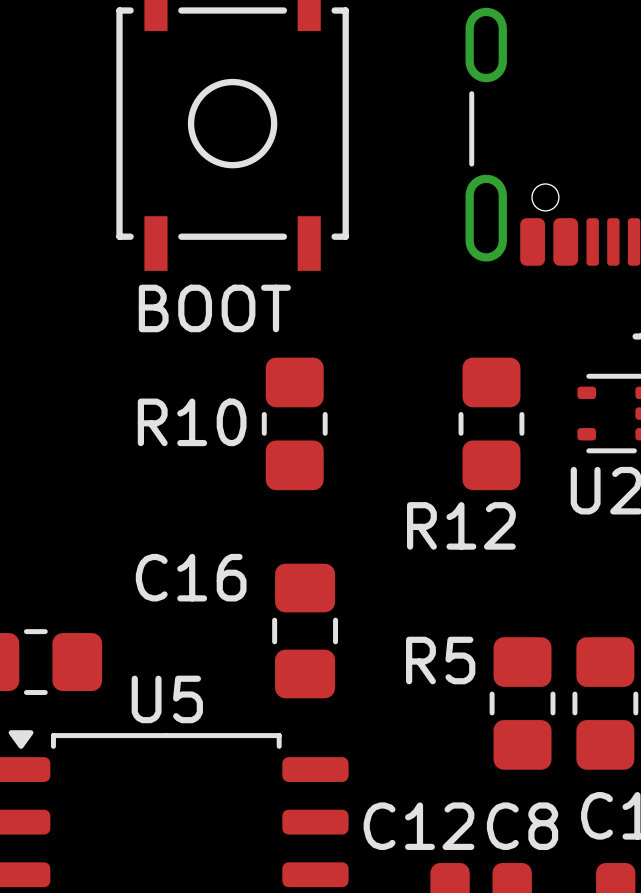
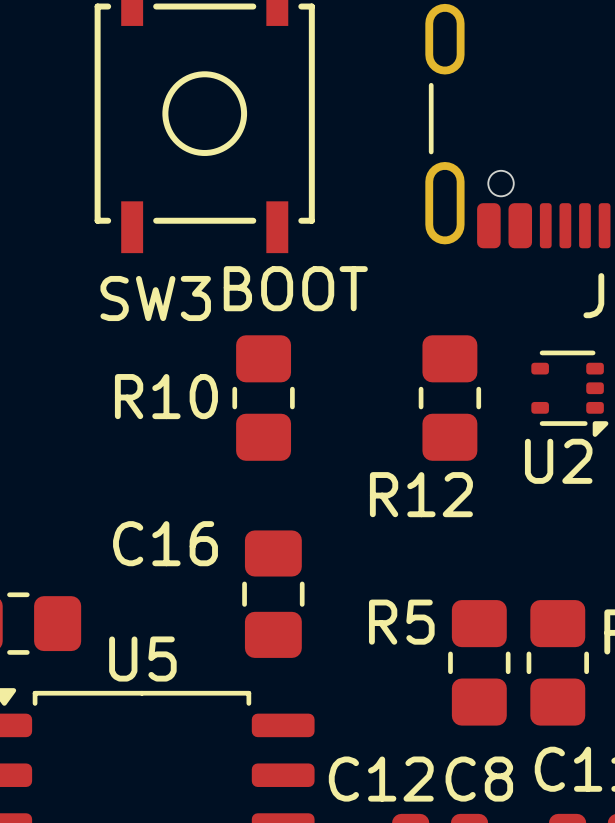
SW3 value position: BOOT (214, 308) -> BOOT (295, 288)
SW3 name: none -> SW3 (155, 298)

